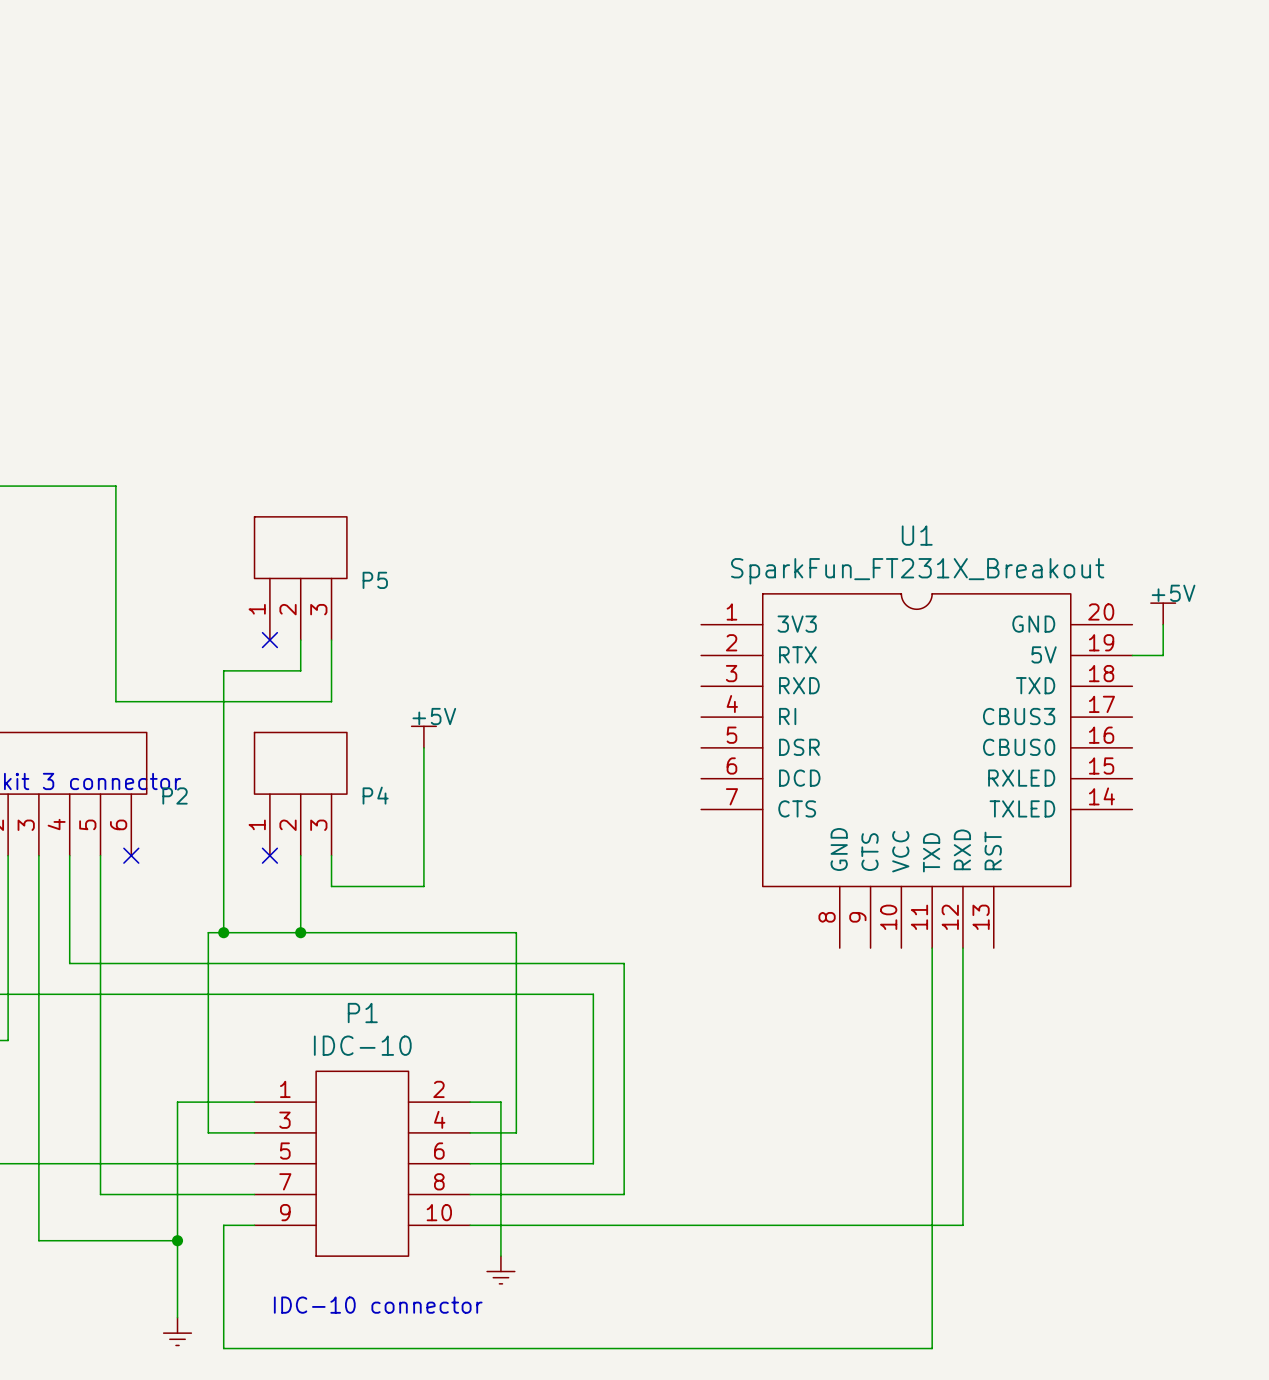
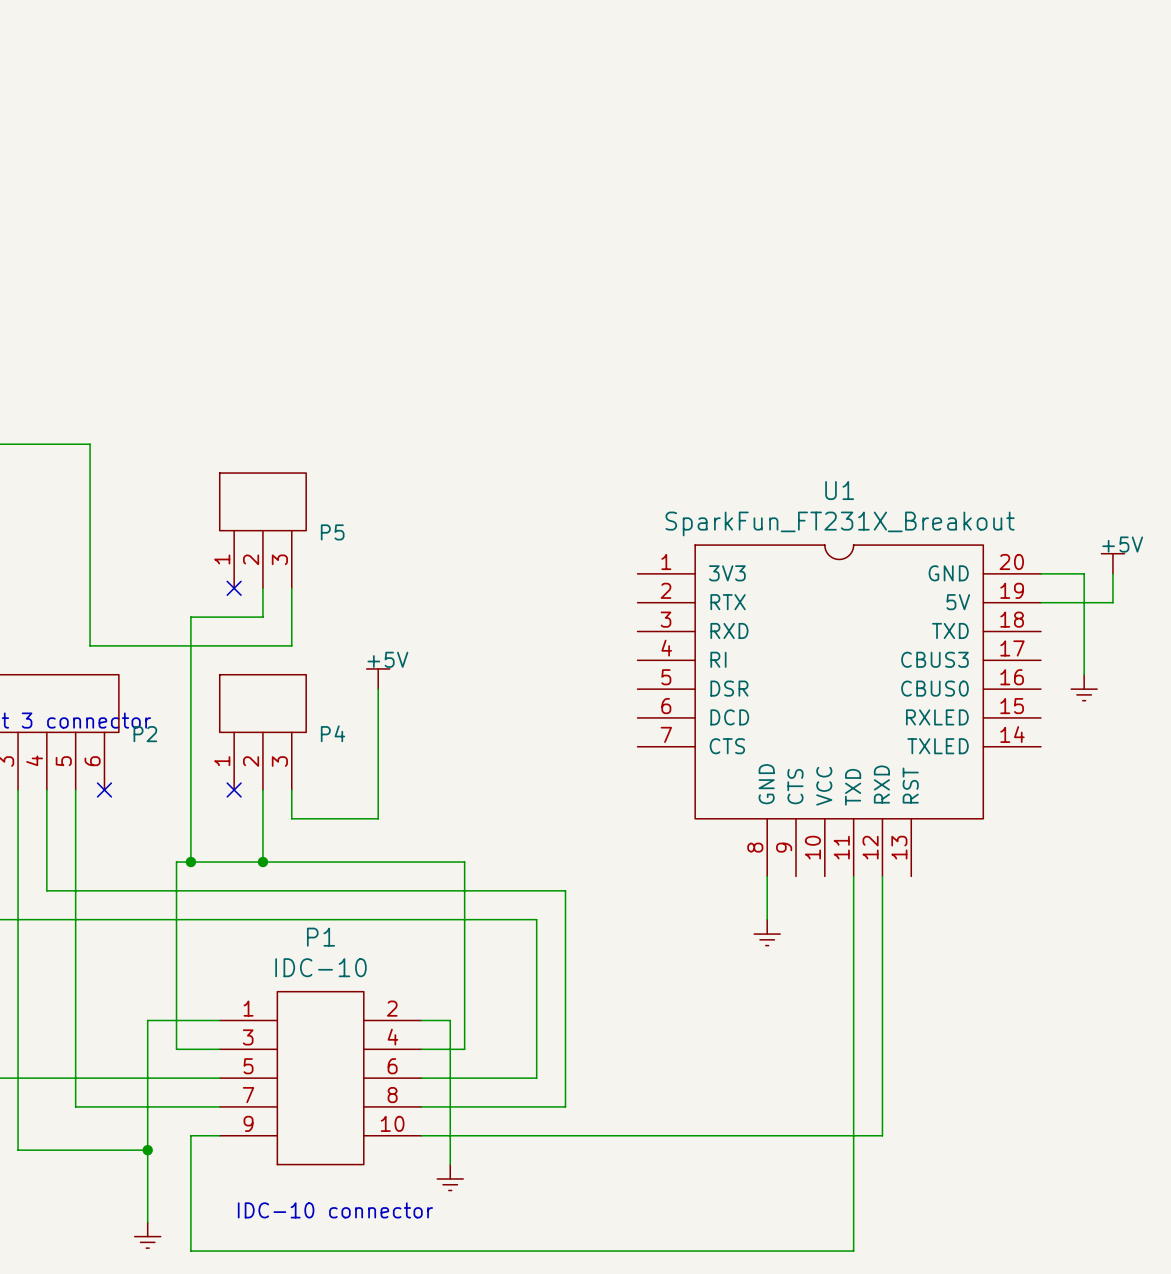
power symbol position: +5V (1163, 613) -> +5V (1112, 563)
wire: none -> (1040, 573) (1084, 573) (1084, 674)
wire: (1163, 624) (1163, 655) -> (1112, 573) (1112, 602) (1069, 602)
power symbol: none -> (1084, 687)
wire: none -> (767, 876) (767, 919)
power symbol: none -> (767, 932)

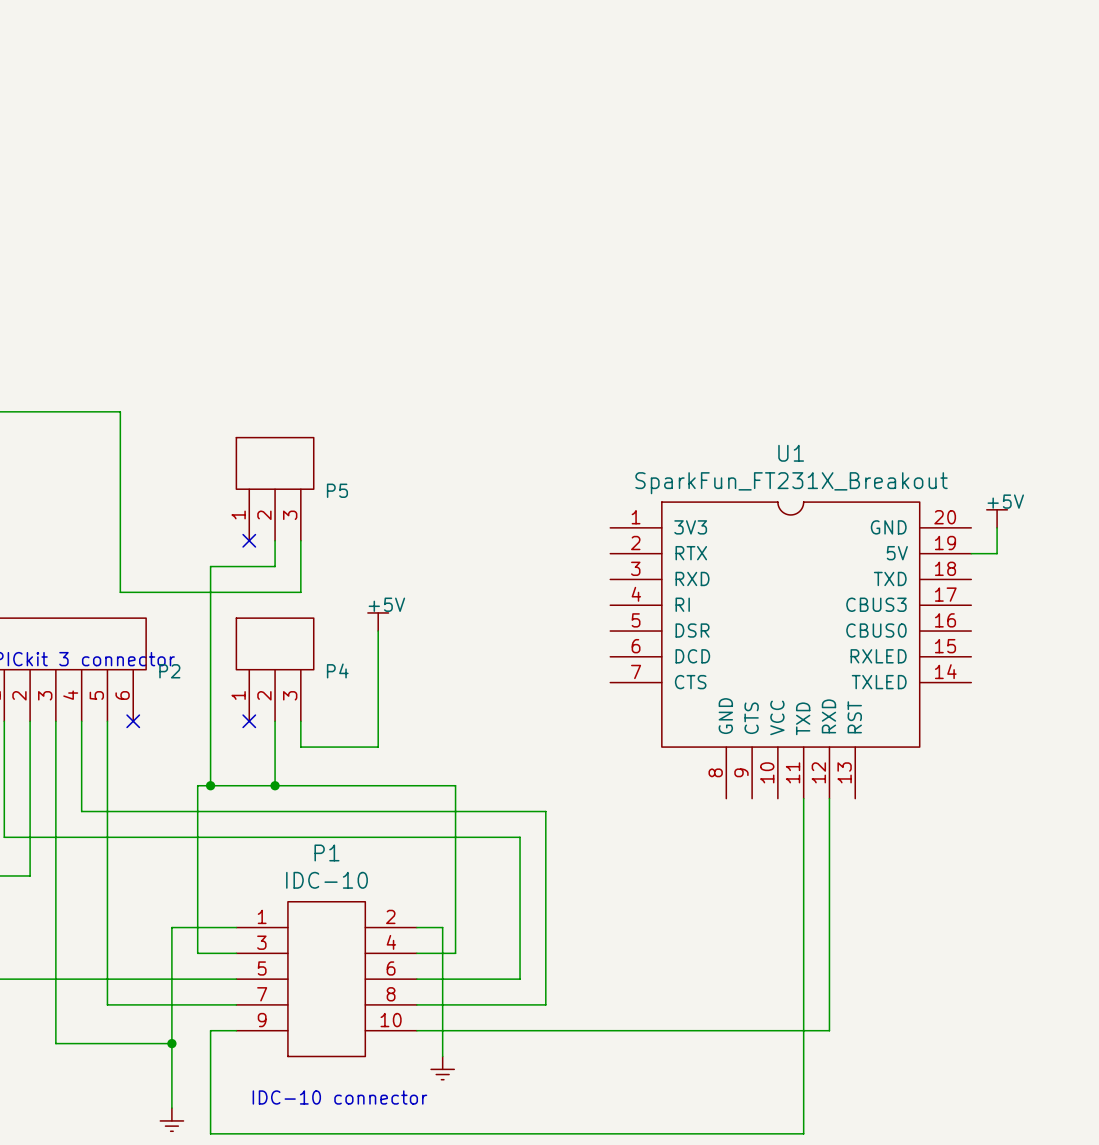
power symbol position: +5V (1112, 563) -> +5V (997, 518)
wire: (1040, 573) (1084, 573) (1084, 674) -> none
wire: (1112, 573) (1112, 602) (1069, 602) -> (997, 527) (997, 553)
power symbol: (1084, 687) -> none
wire: (767, 876) (767, 919) -> none
power symbol: (767, 932) -> none

